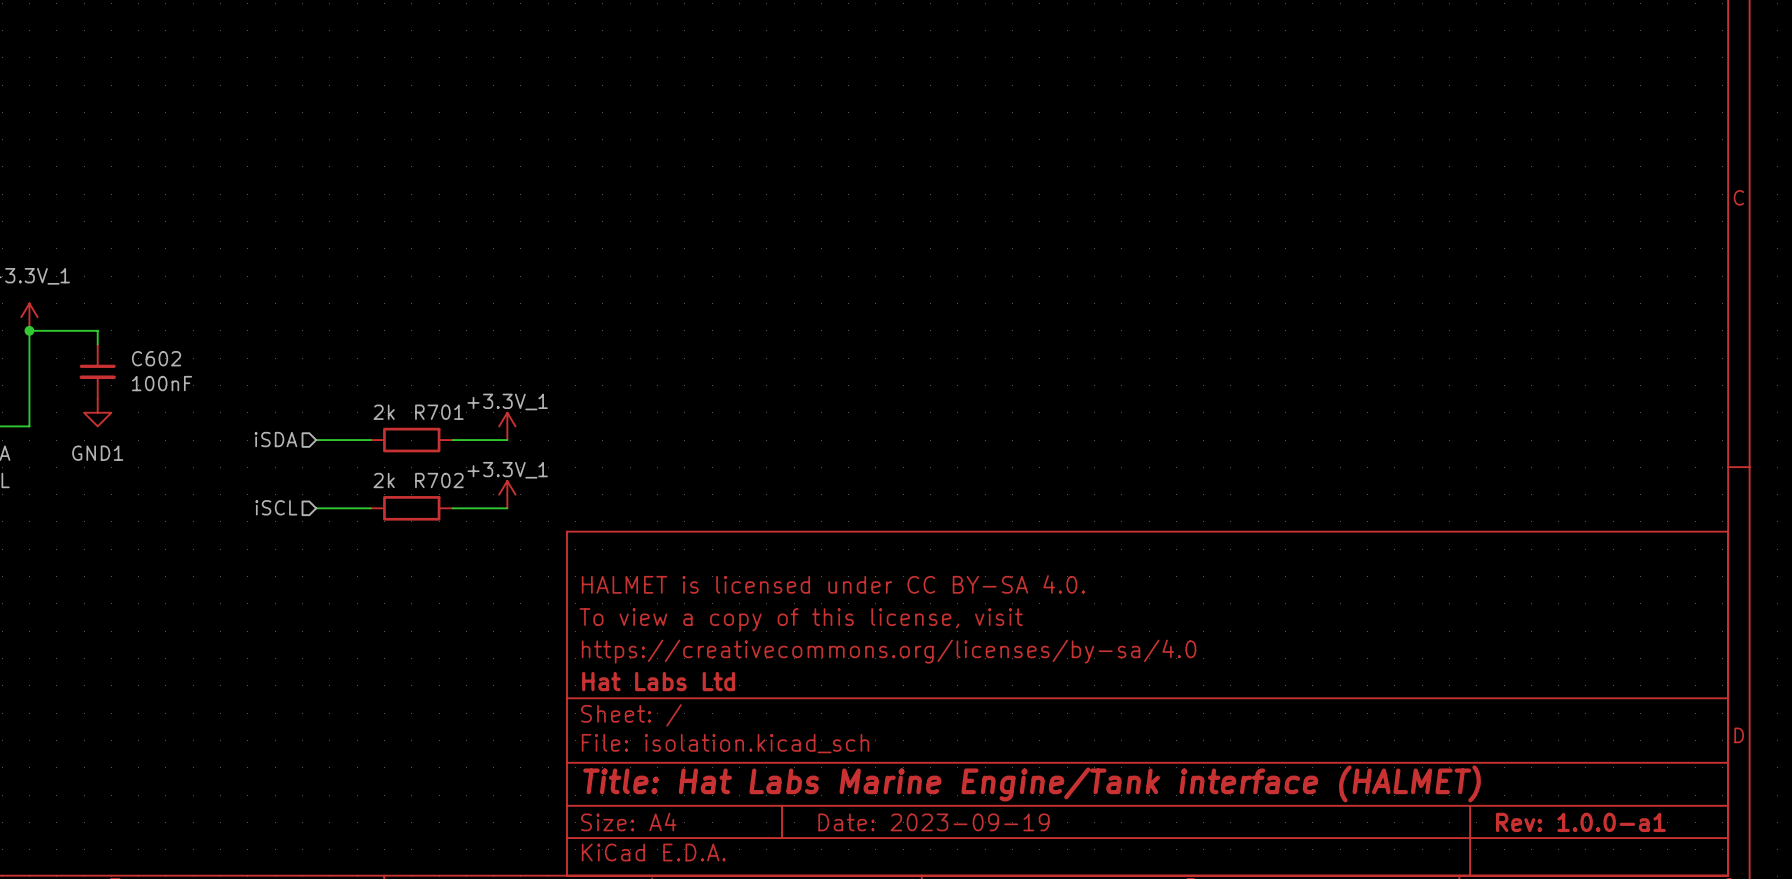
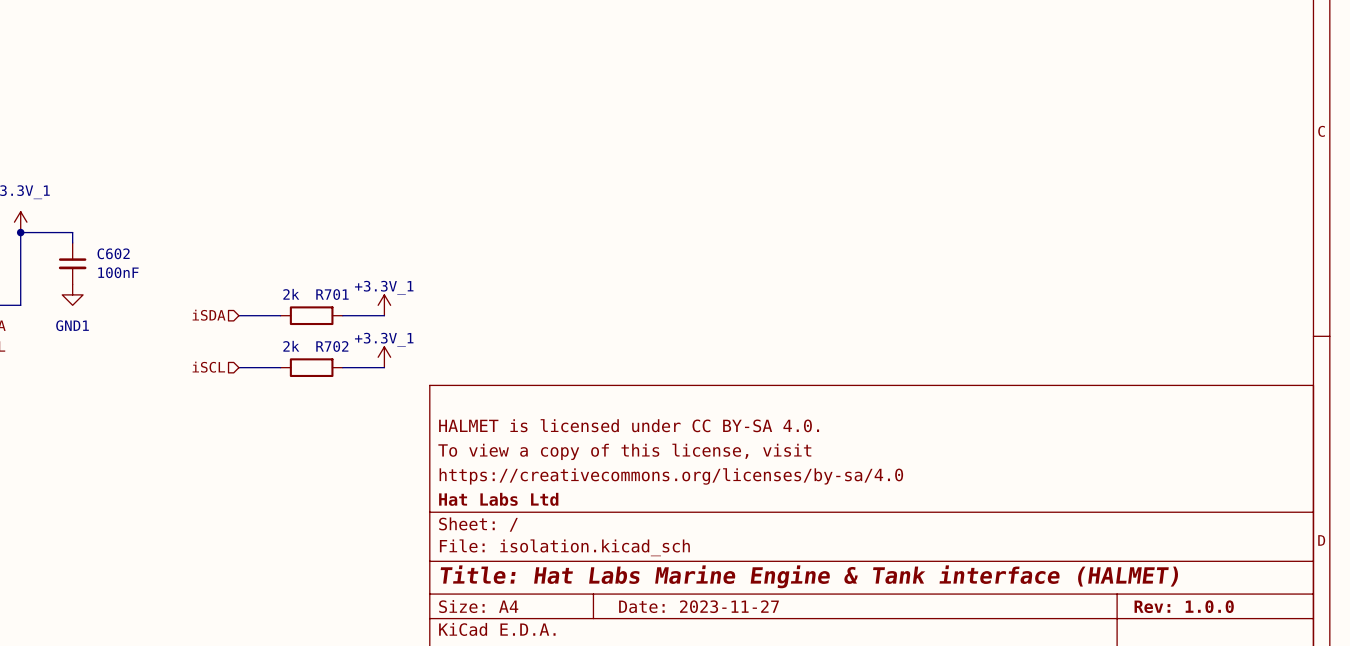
title block: Title: Hat Labs Marine Engine/Tank interface (HALMET) (1032, 783) -> Title: Hat Labs Marine Engine & Tank interface (HALMET) (809, 576)
title block: Date: 2023-09-19 (934, 822) -> Date: 2023-11-27 (699, 606)
title block: Rev: 1.0.0-a1 (1580, 822) -> Rev: 1.0.0 (1184, 606)

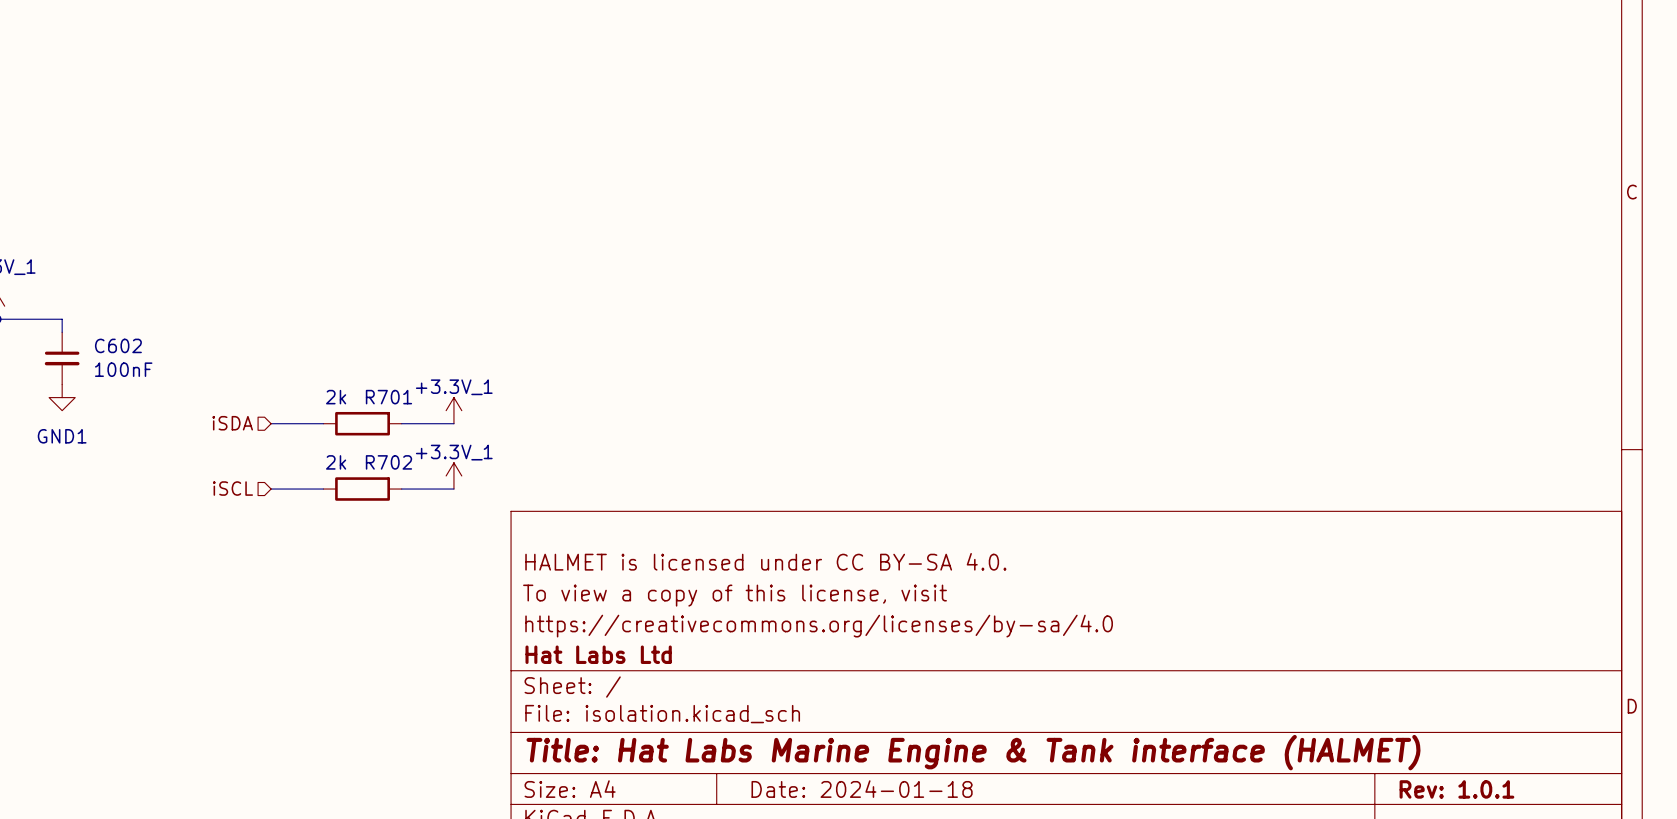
title block: Date: 2023-11-27 (699, 606) -> Date: 2024-01-18 (862, 789)
title block: Rev: 1.0.0 (1184, 606) -> Rev: 1.0.1 (1456, 789)

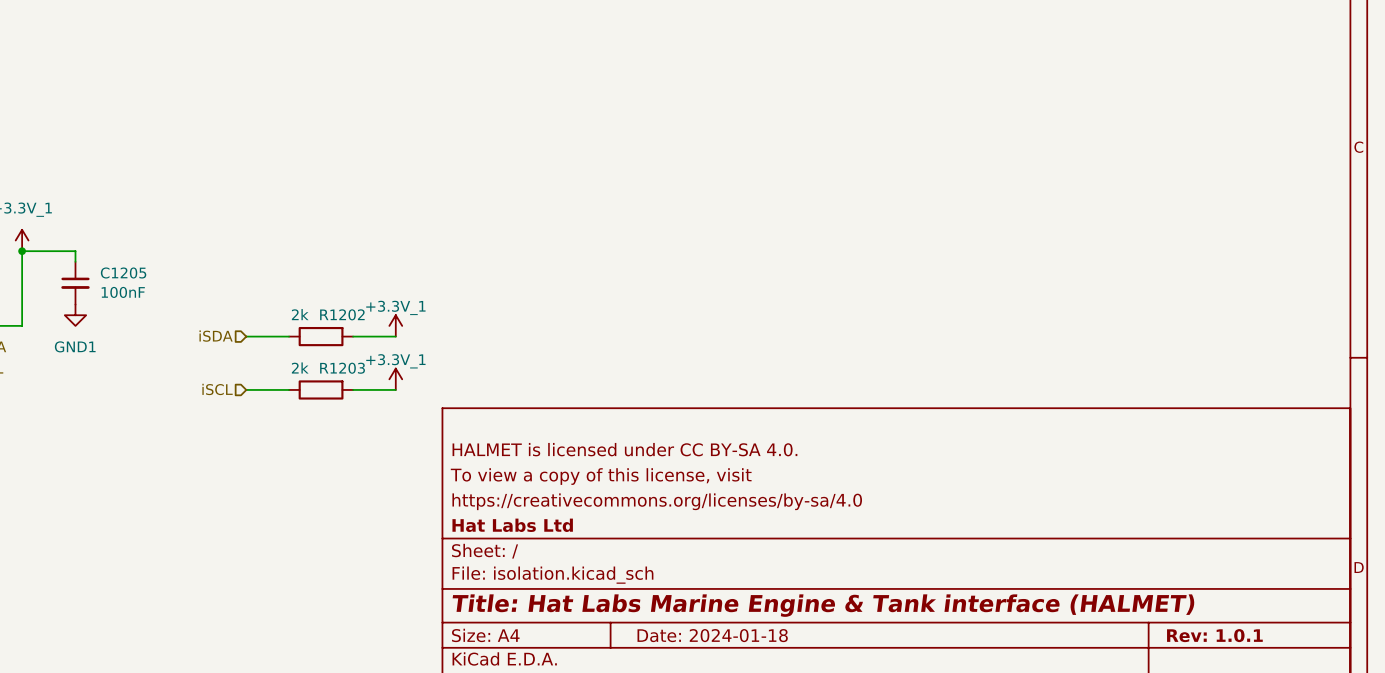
C602 name: C602 (118, 345) -> C1205 (123, 272)
R701 name: R701 (388, 397) -> R1202 (342, 314)
R702 name: R702 (388, 462) -> R1203 (342, 368)

